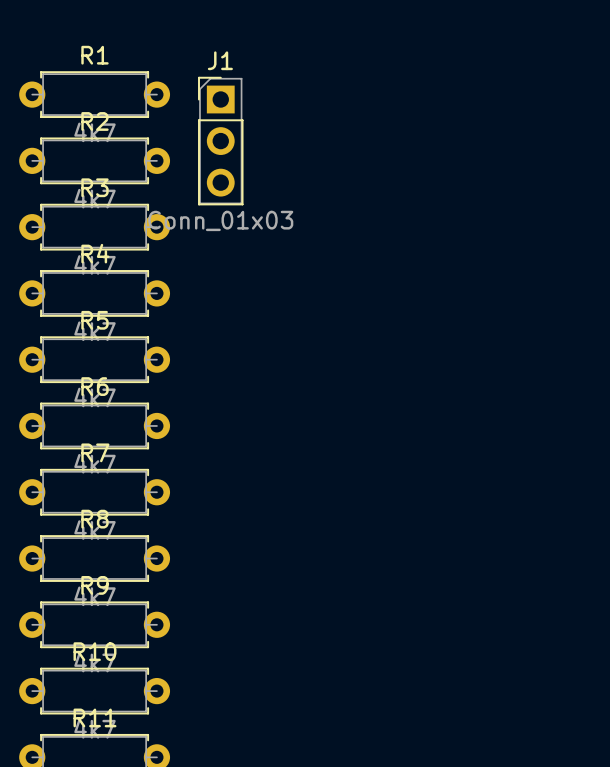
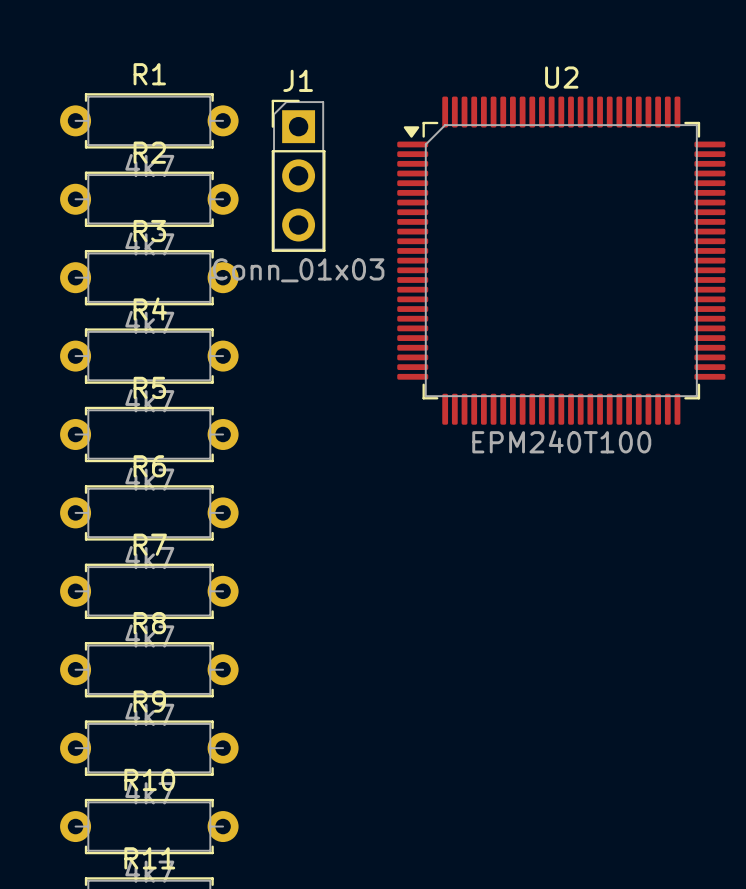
U2: none -> EPM240T100 (561, 260)

